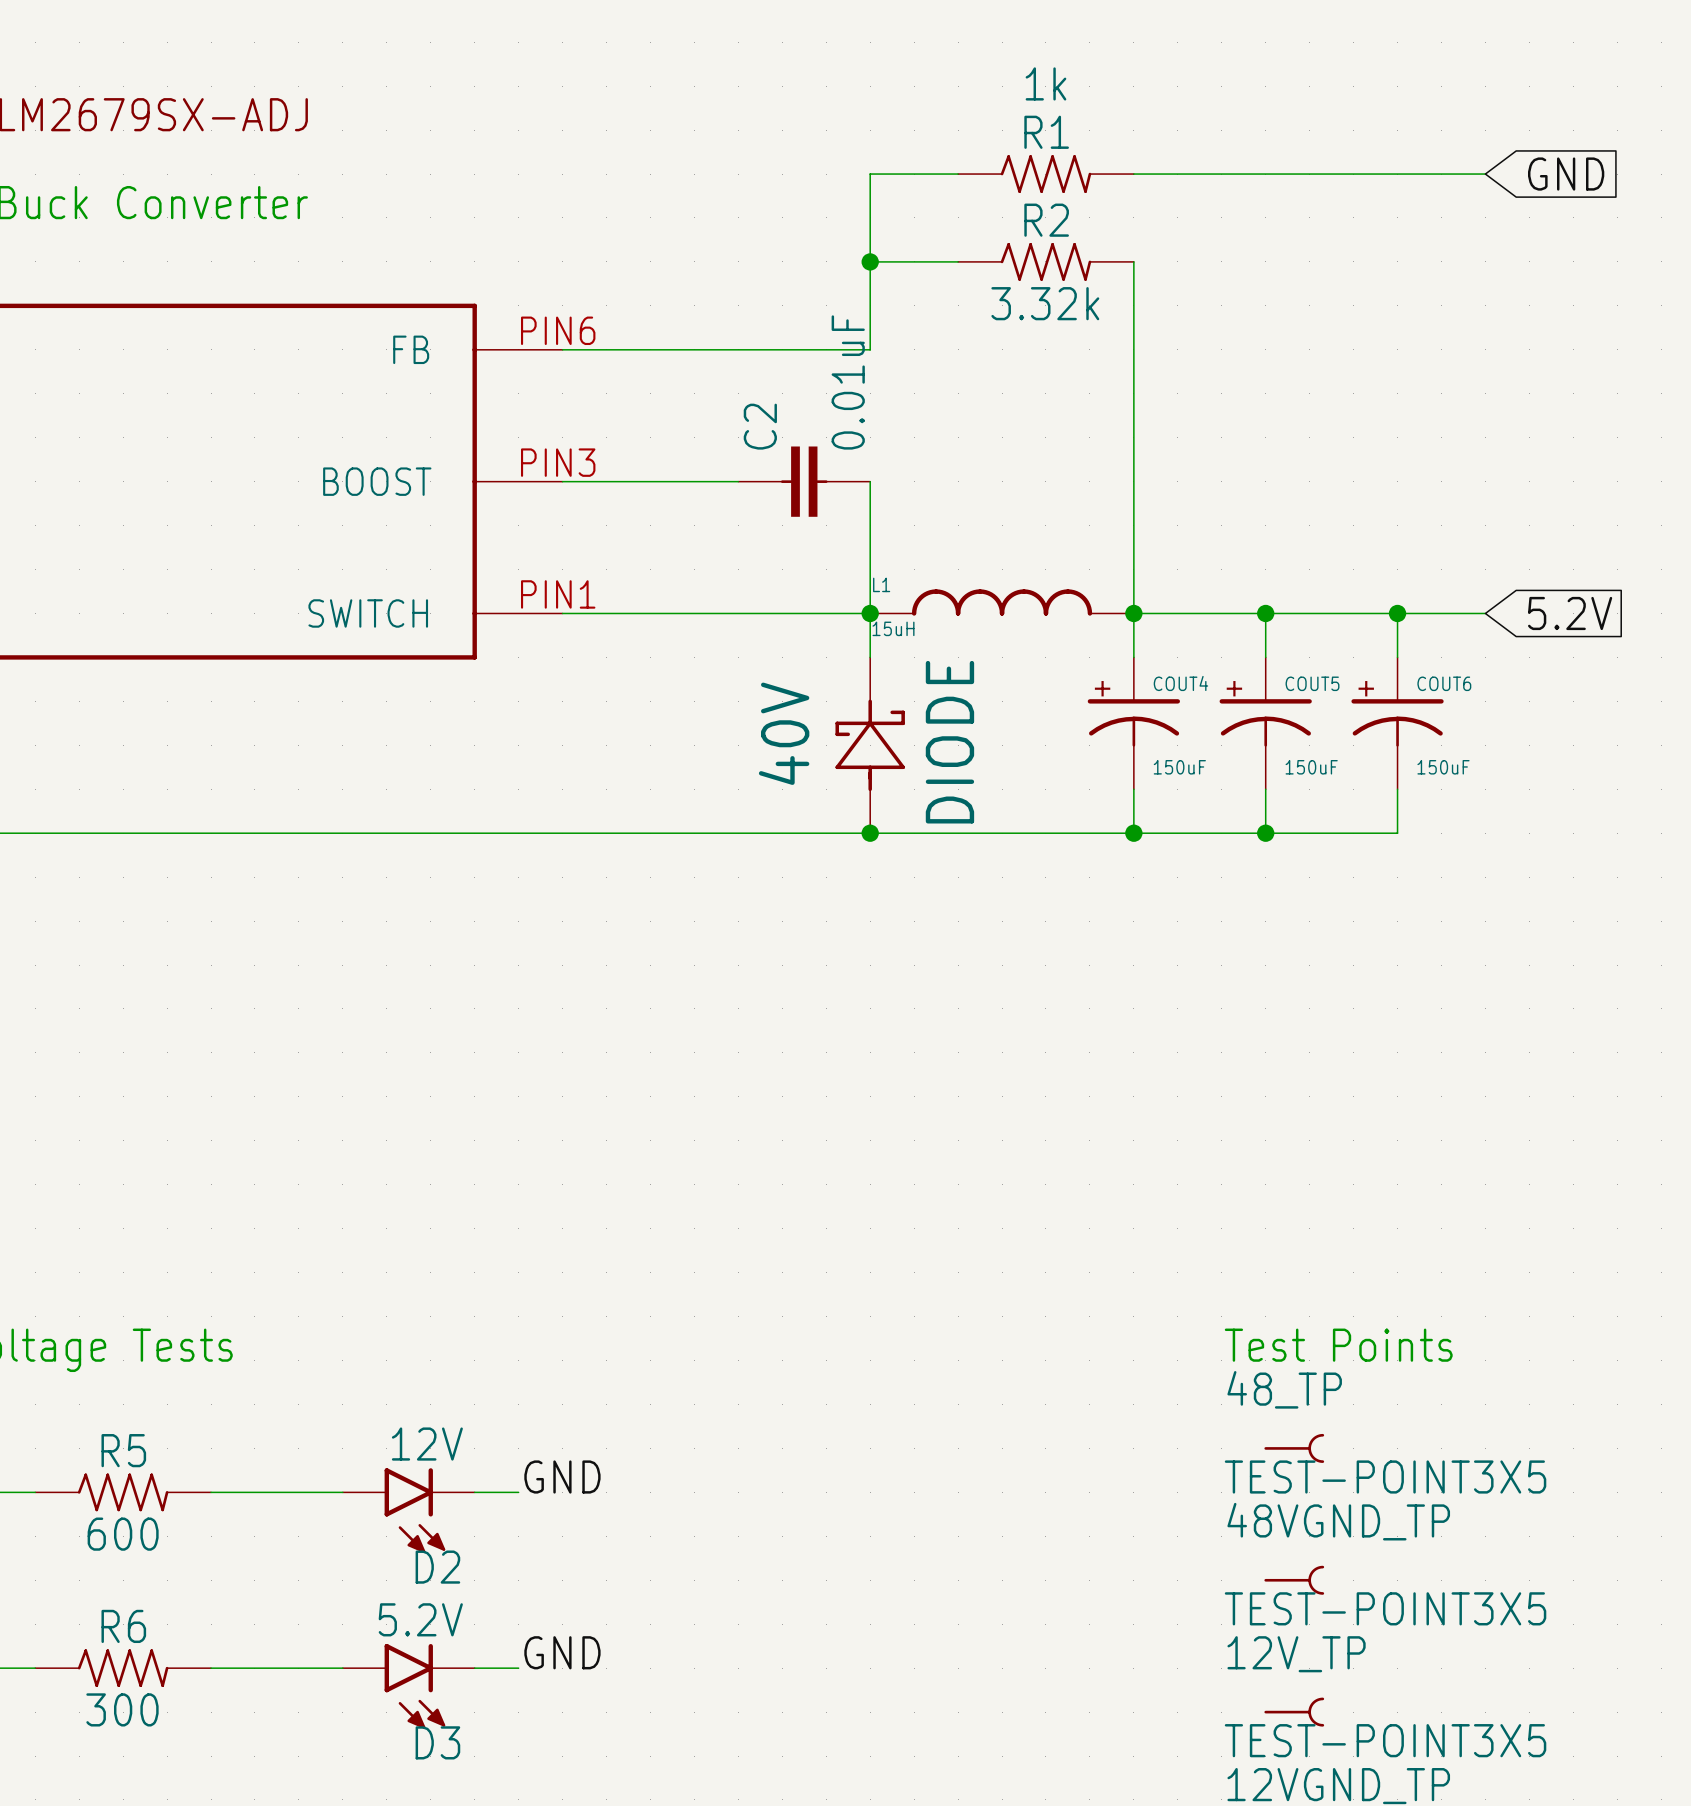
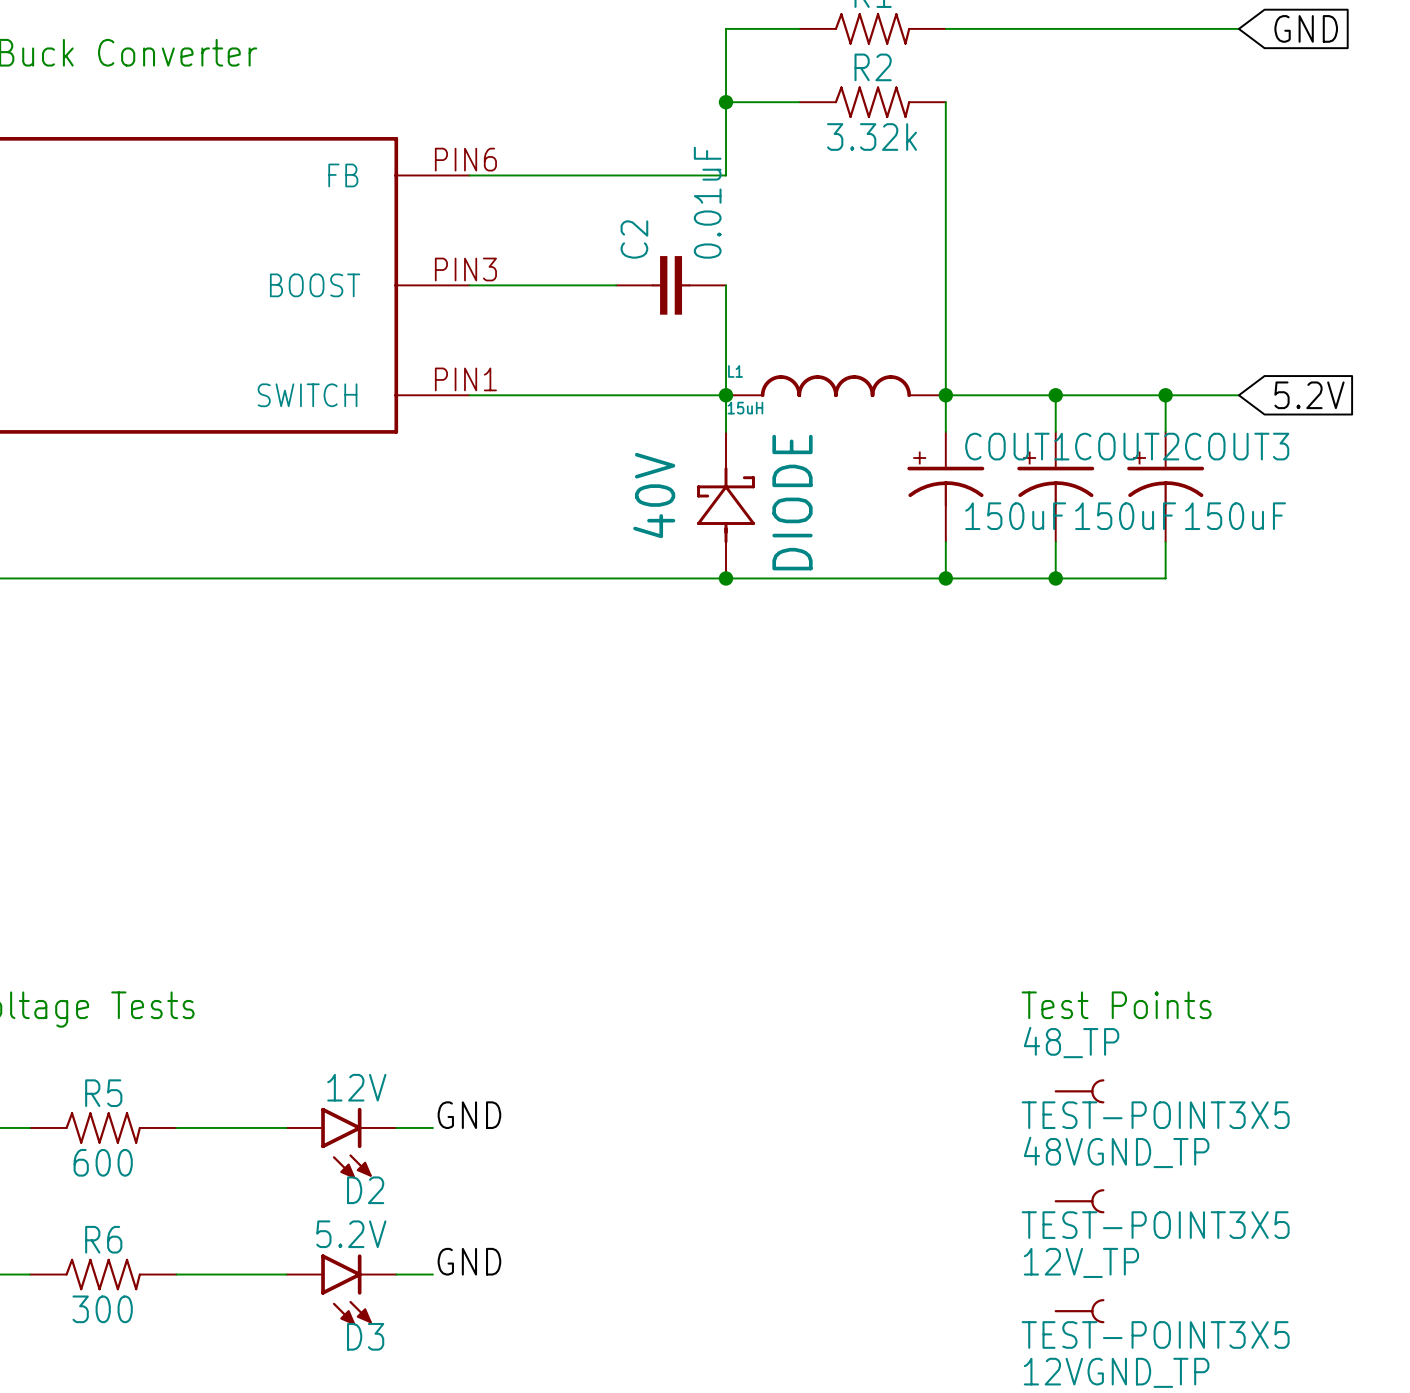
COUT4: 150uF (1133, 723) -> none
COUT1: none -> 150uF (945, 486)
COUT5: 150uF (1265, 723) -> none
COUT2: none -> 150uF (1055, 486)
COUT6: 150uF (1397, 723) -> none
COUT3: none -> 150uF (1165, 486)

